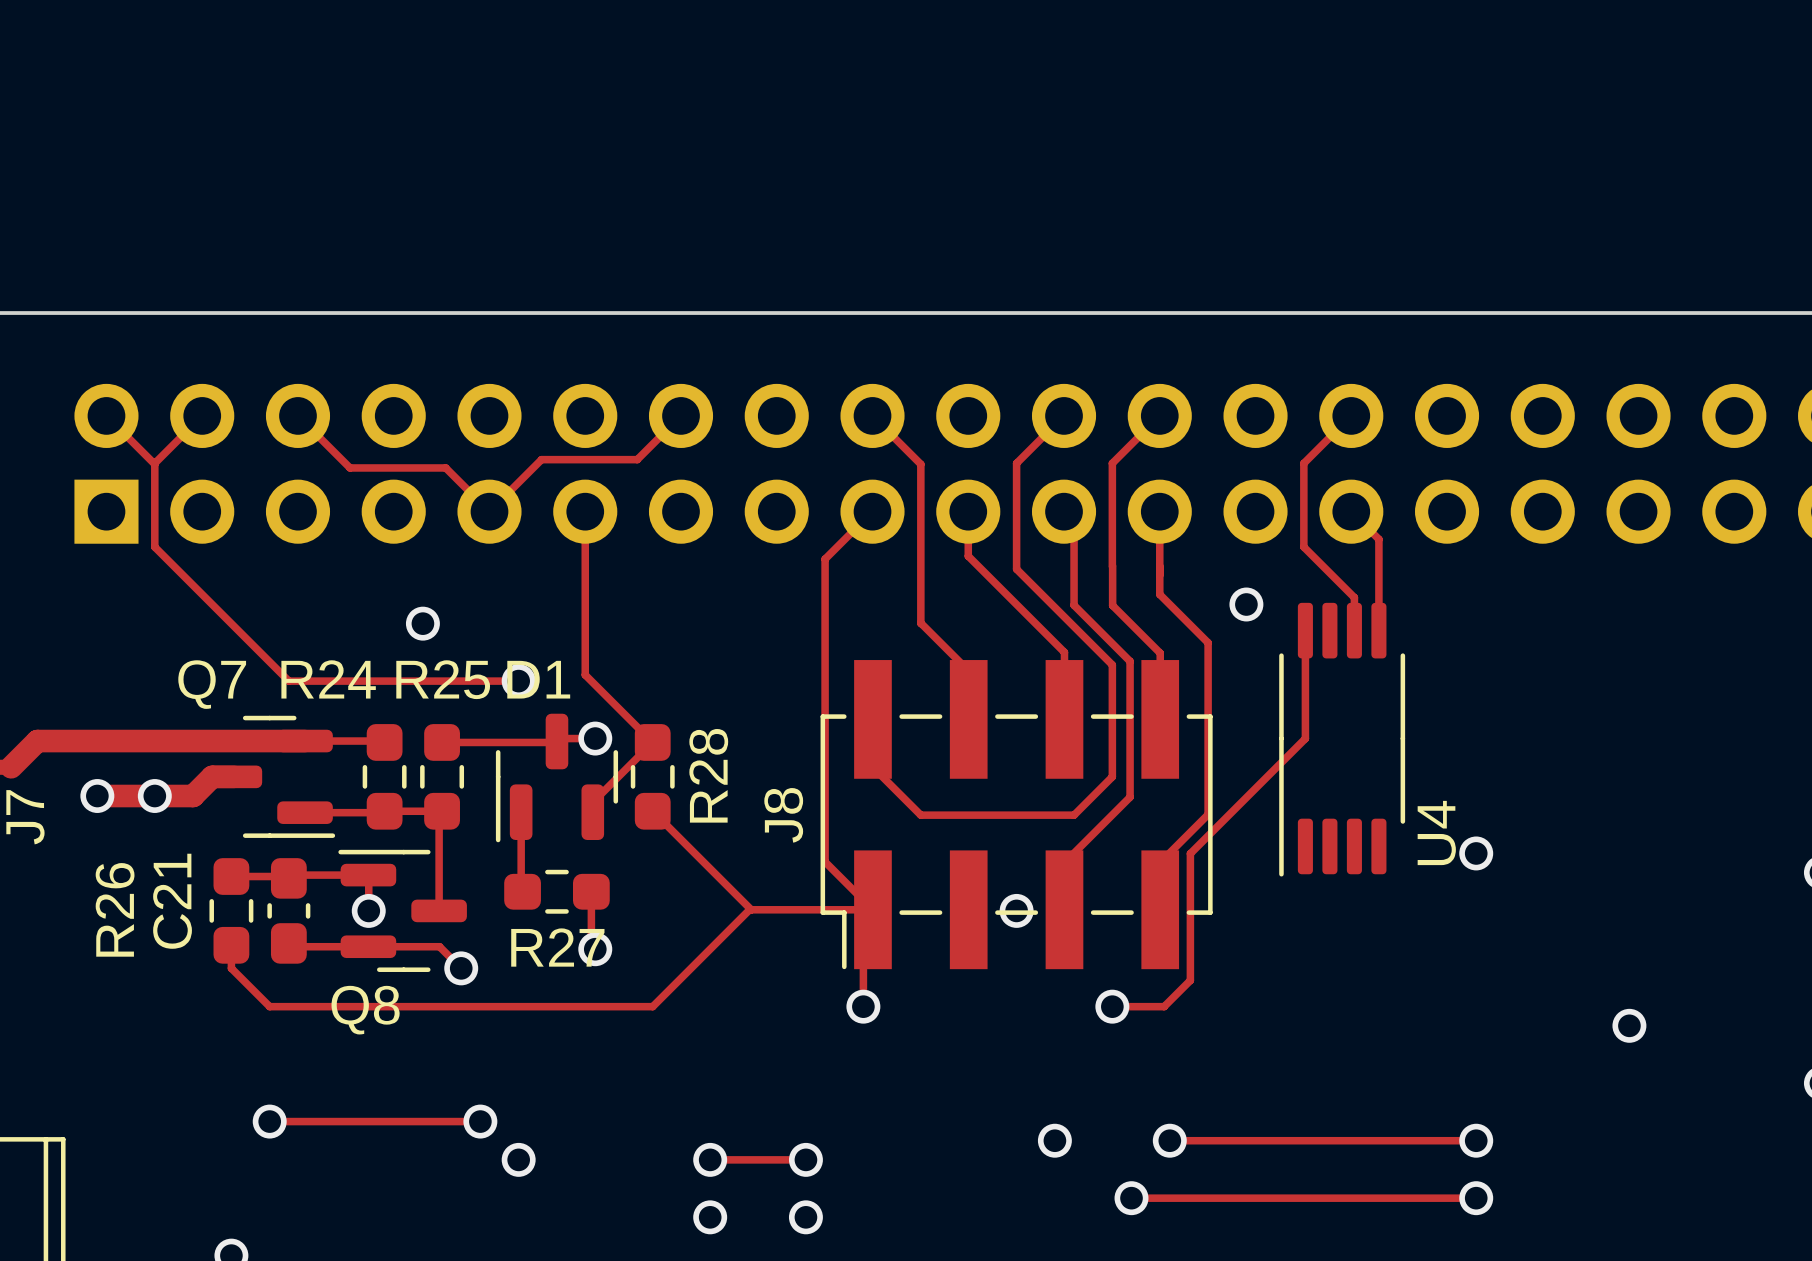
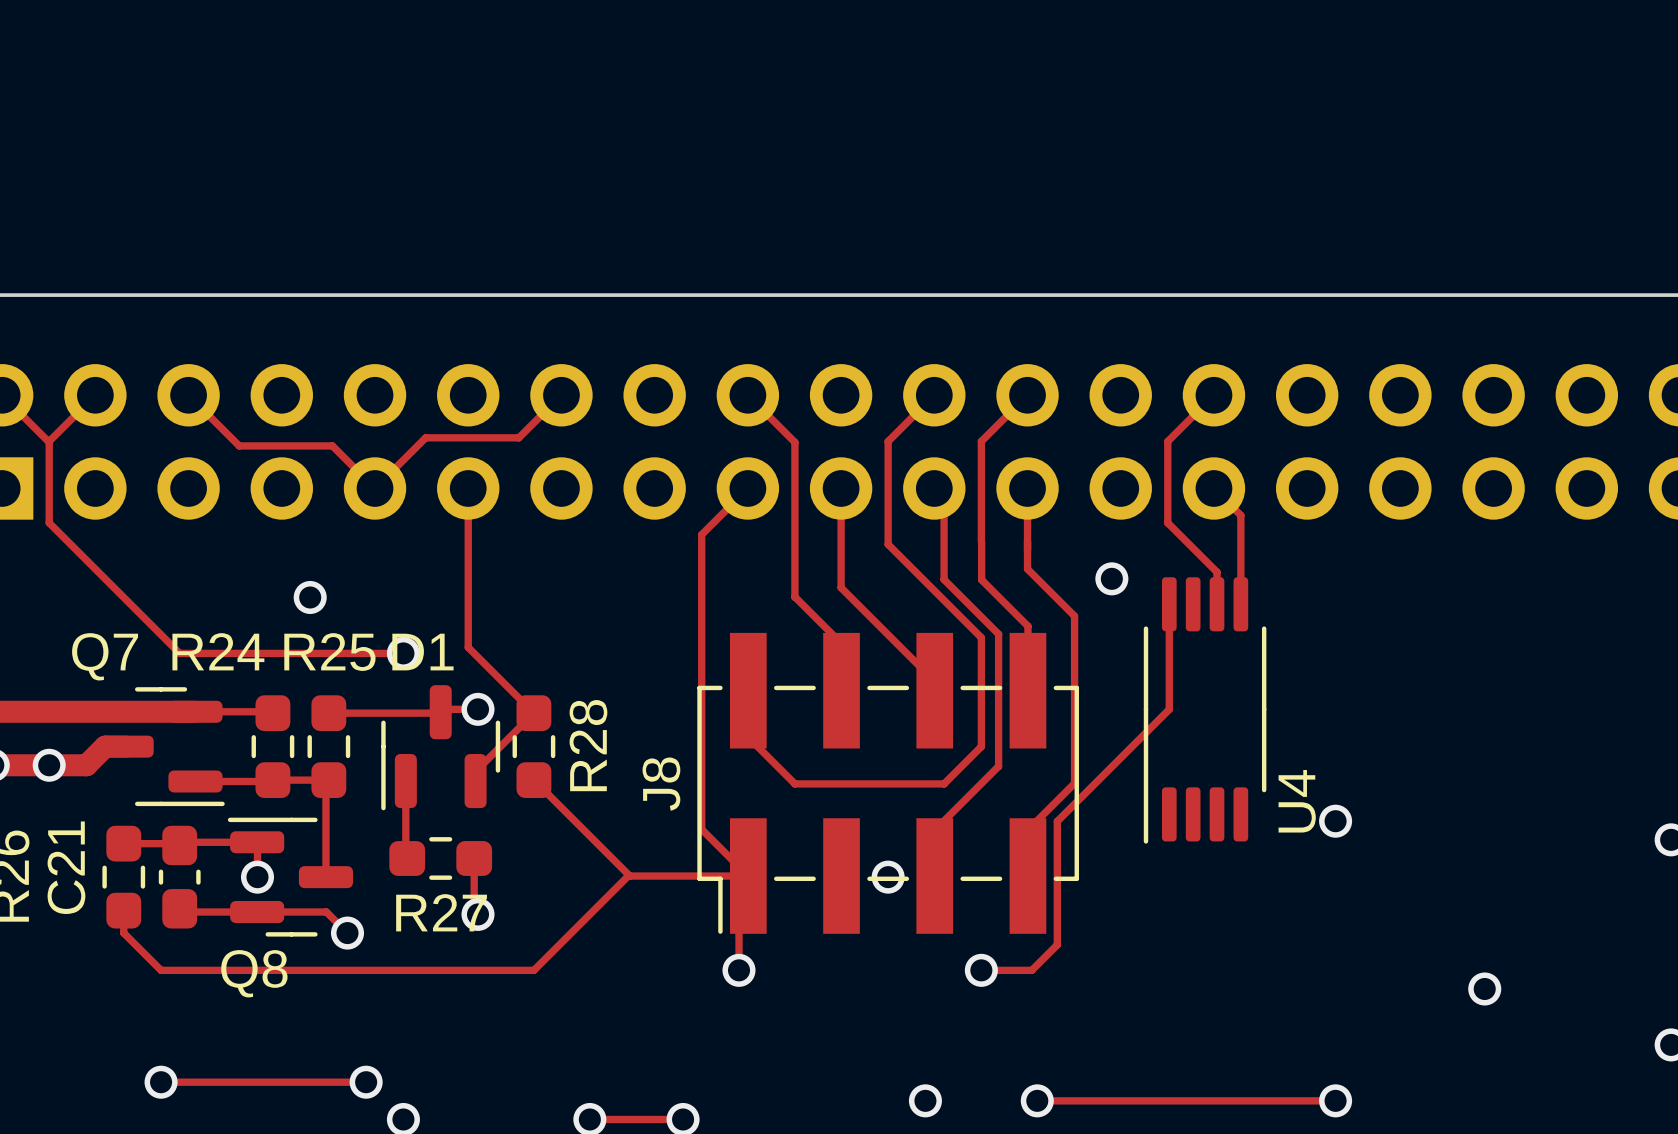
track: (968, 556) (1064, 652) (1064, 709) -> (841, 531) (841, 587) (934, 681)

